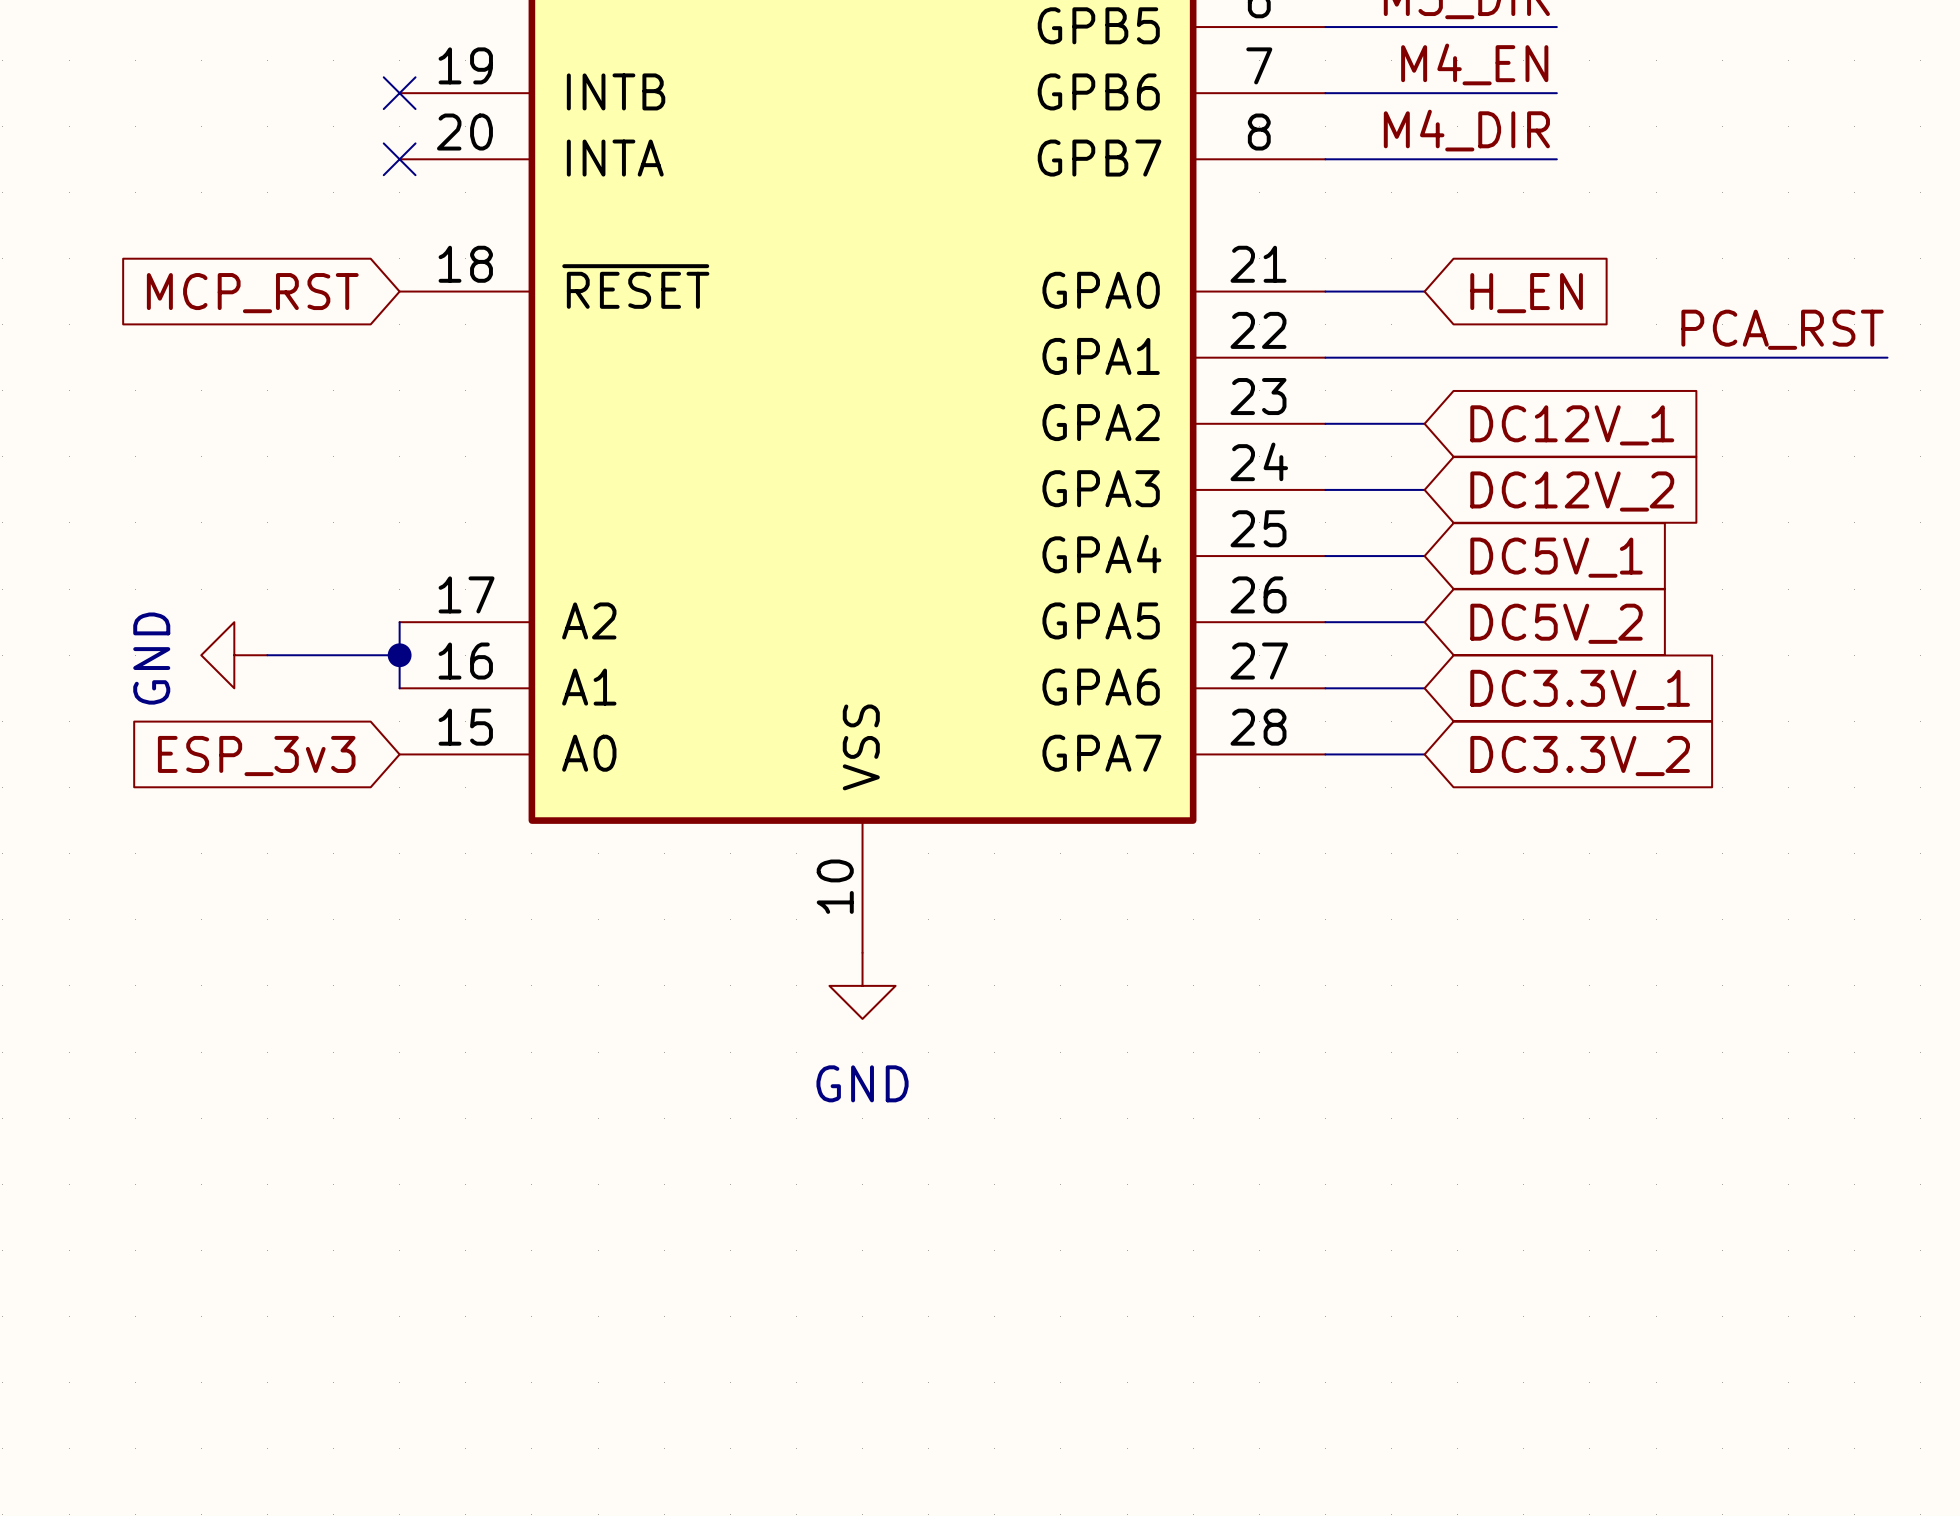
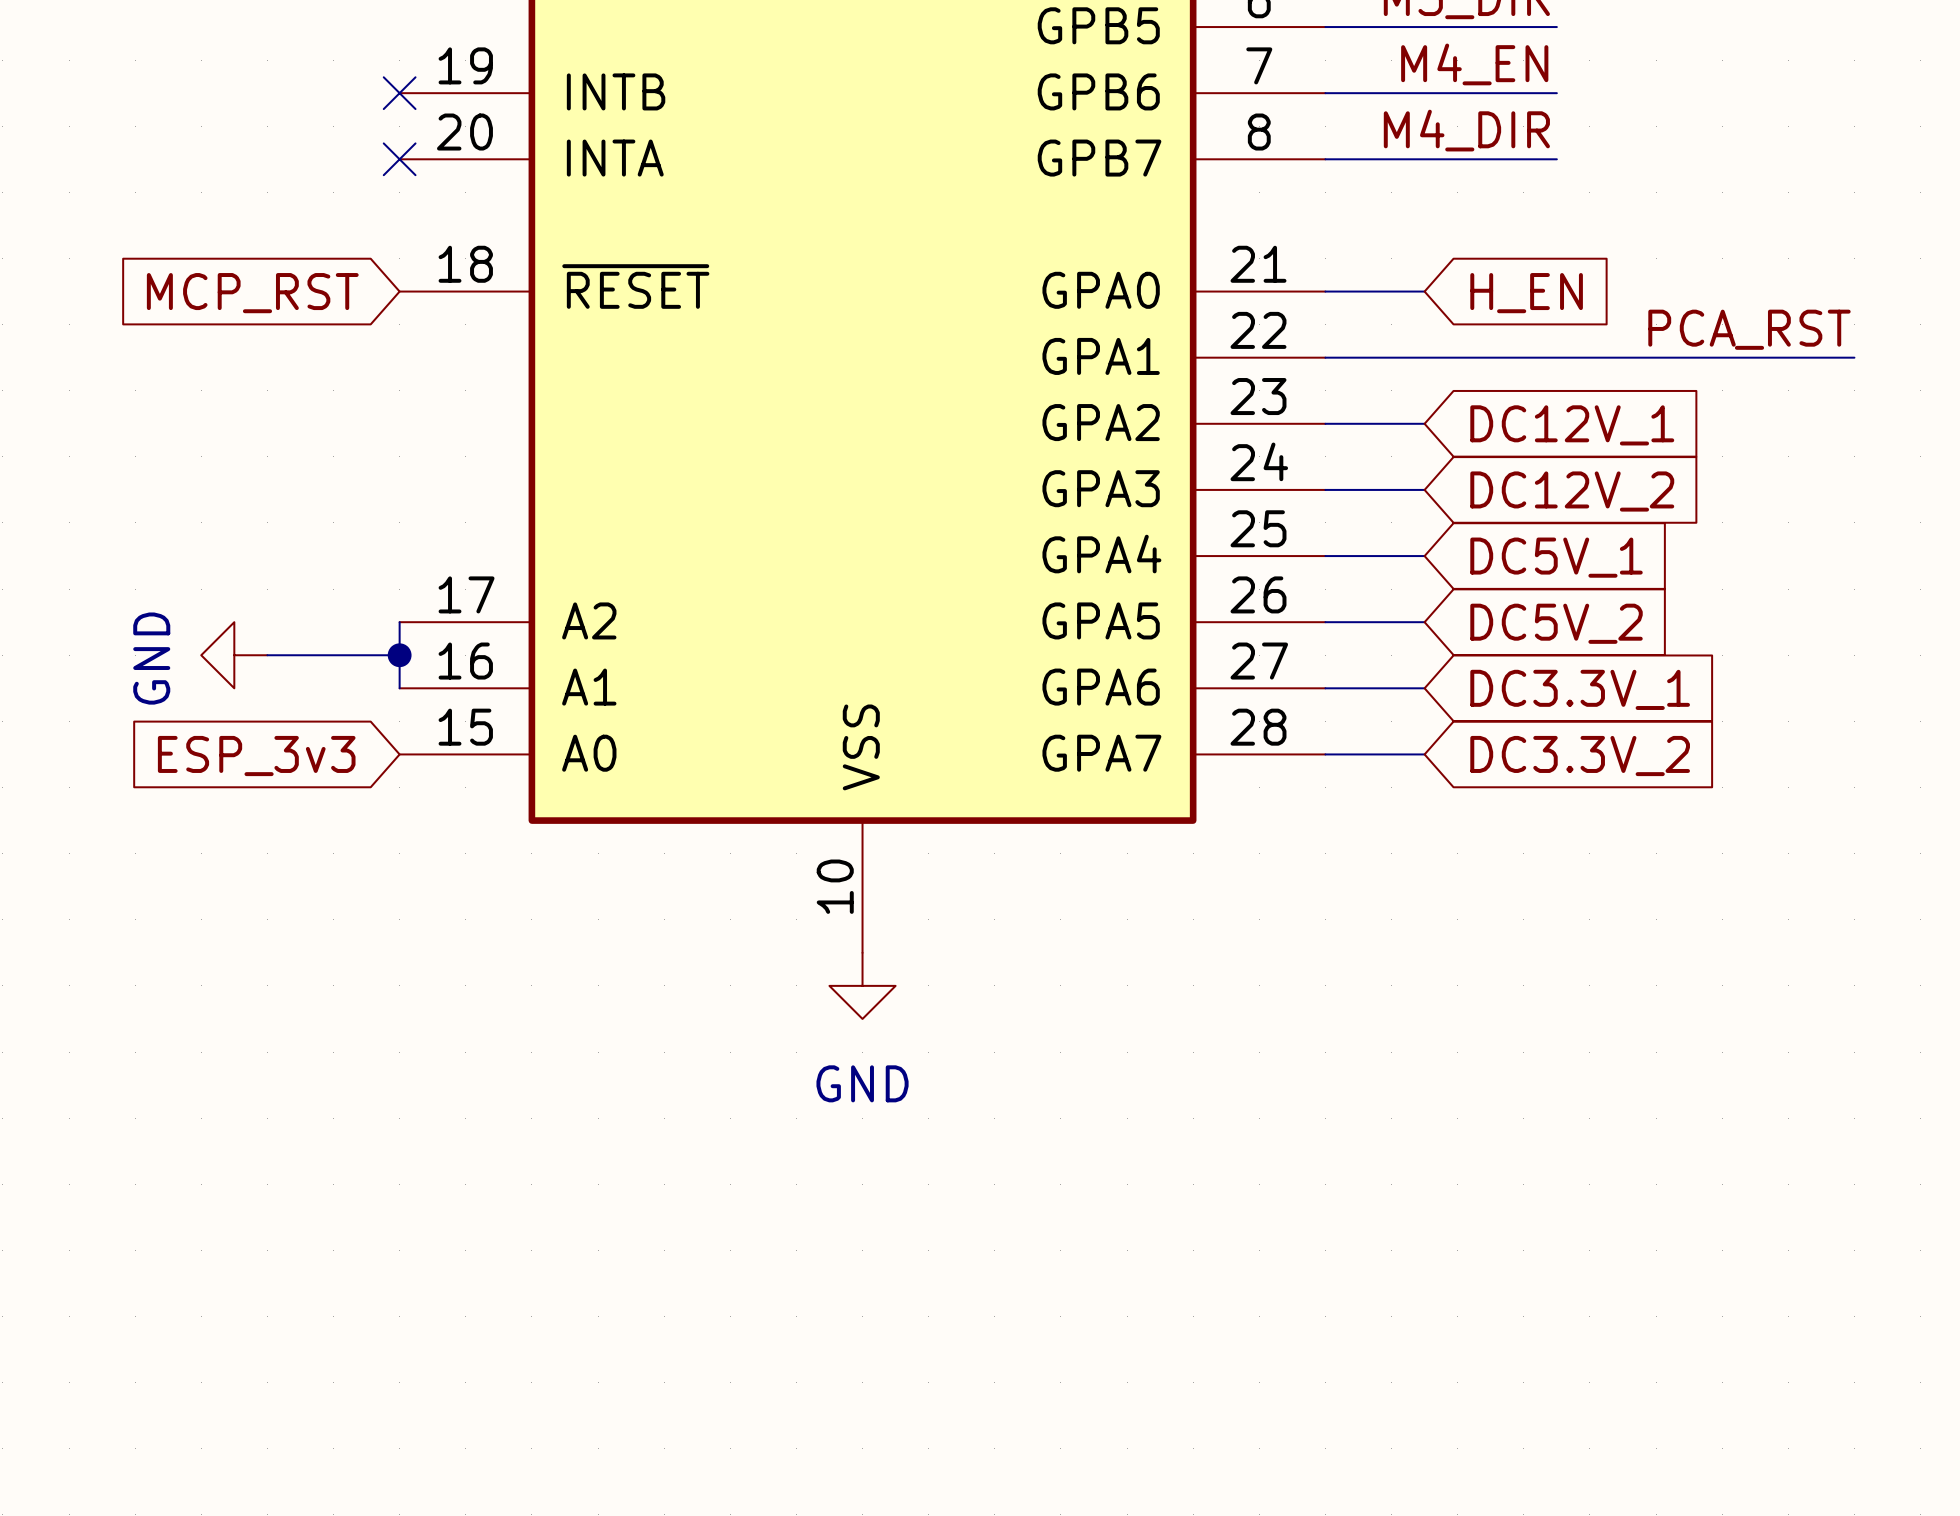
label position: PCA_RST (1782, 329) -> PCA_RST (1749, 329)
wire: (1854, 357) (1887, 357) -> none

